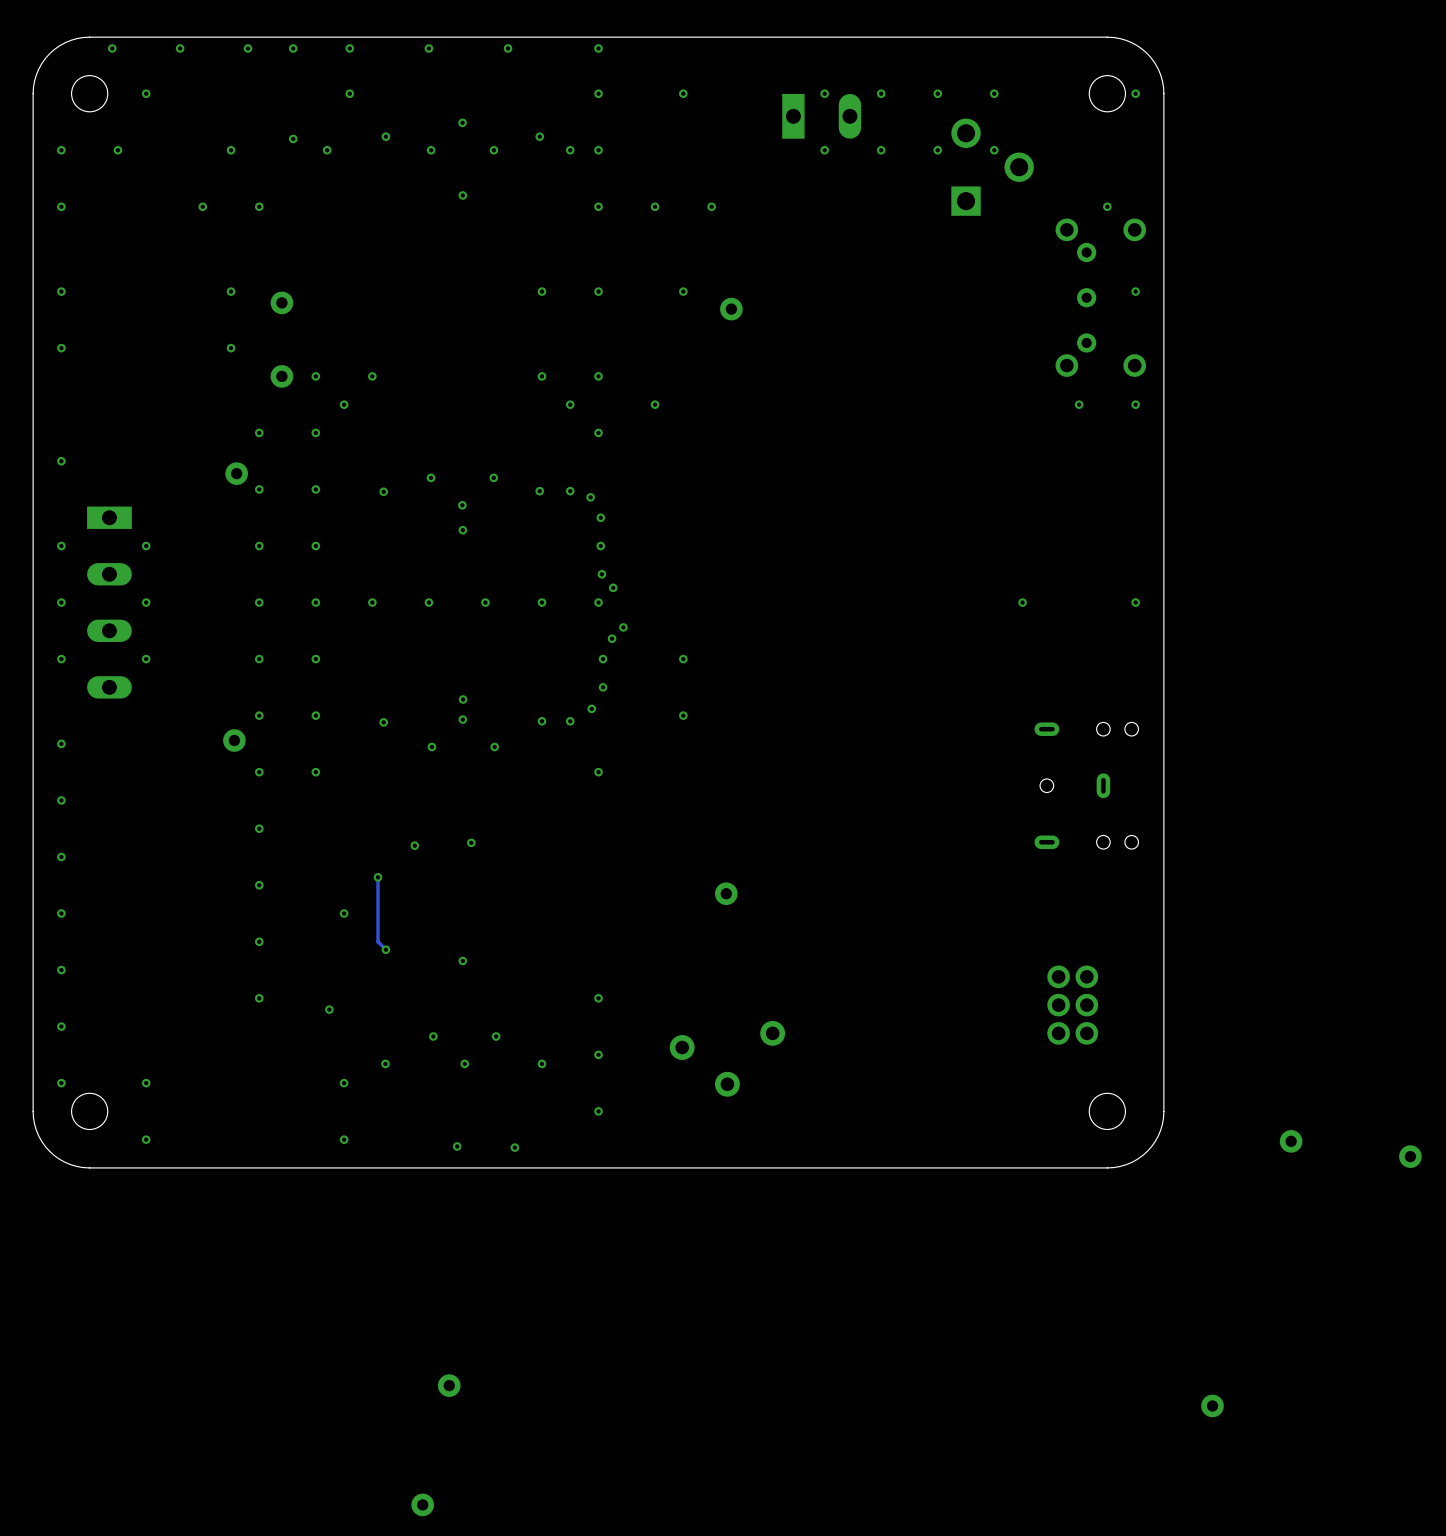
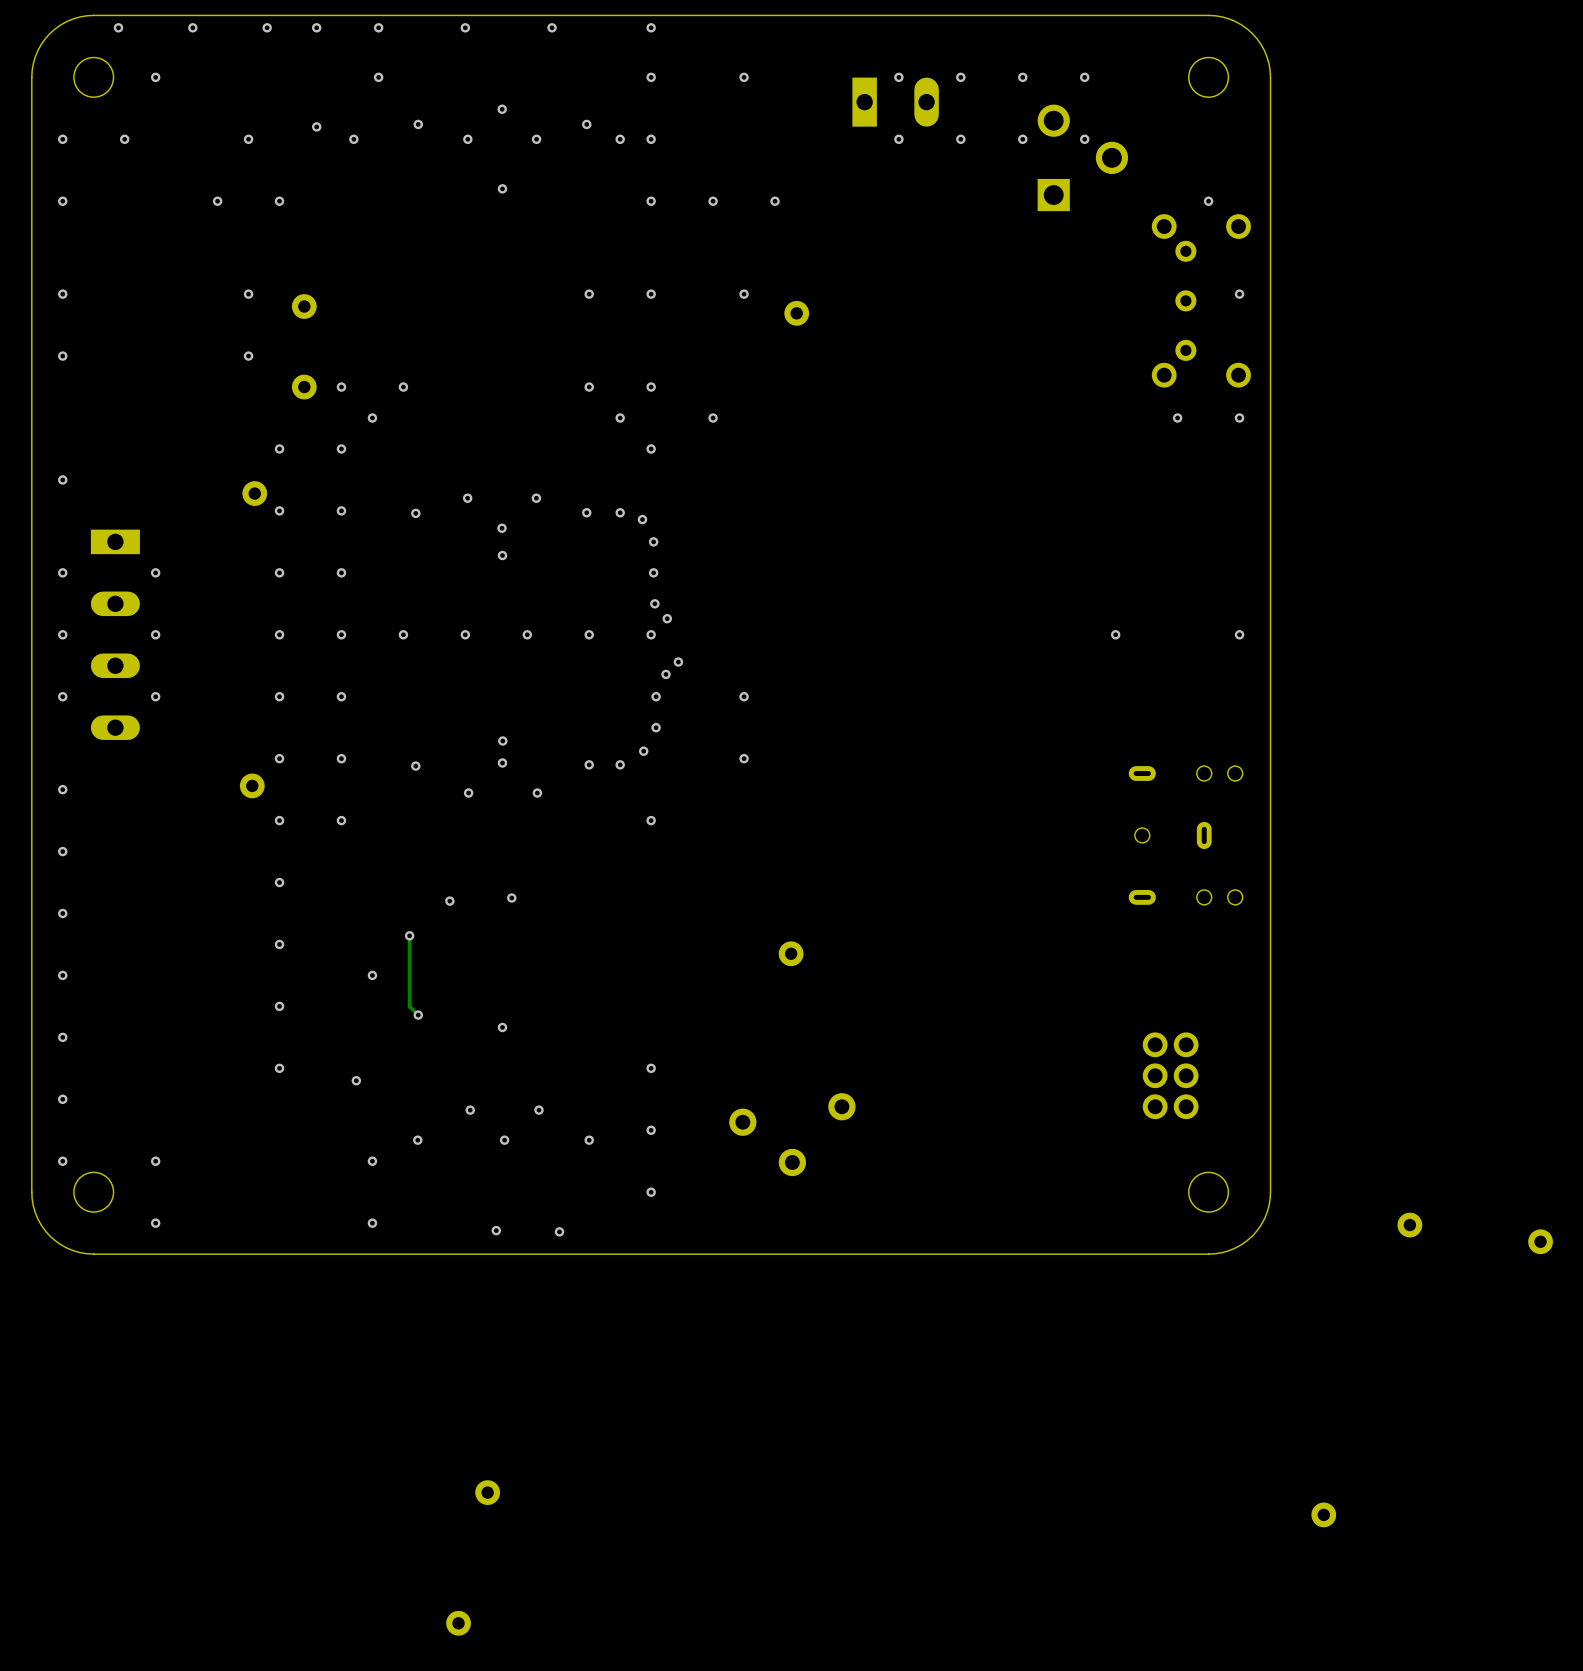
via: (1135, 93) -> none

